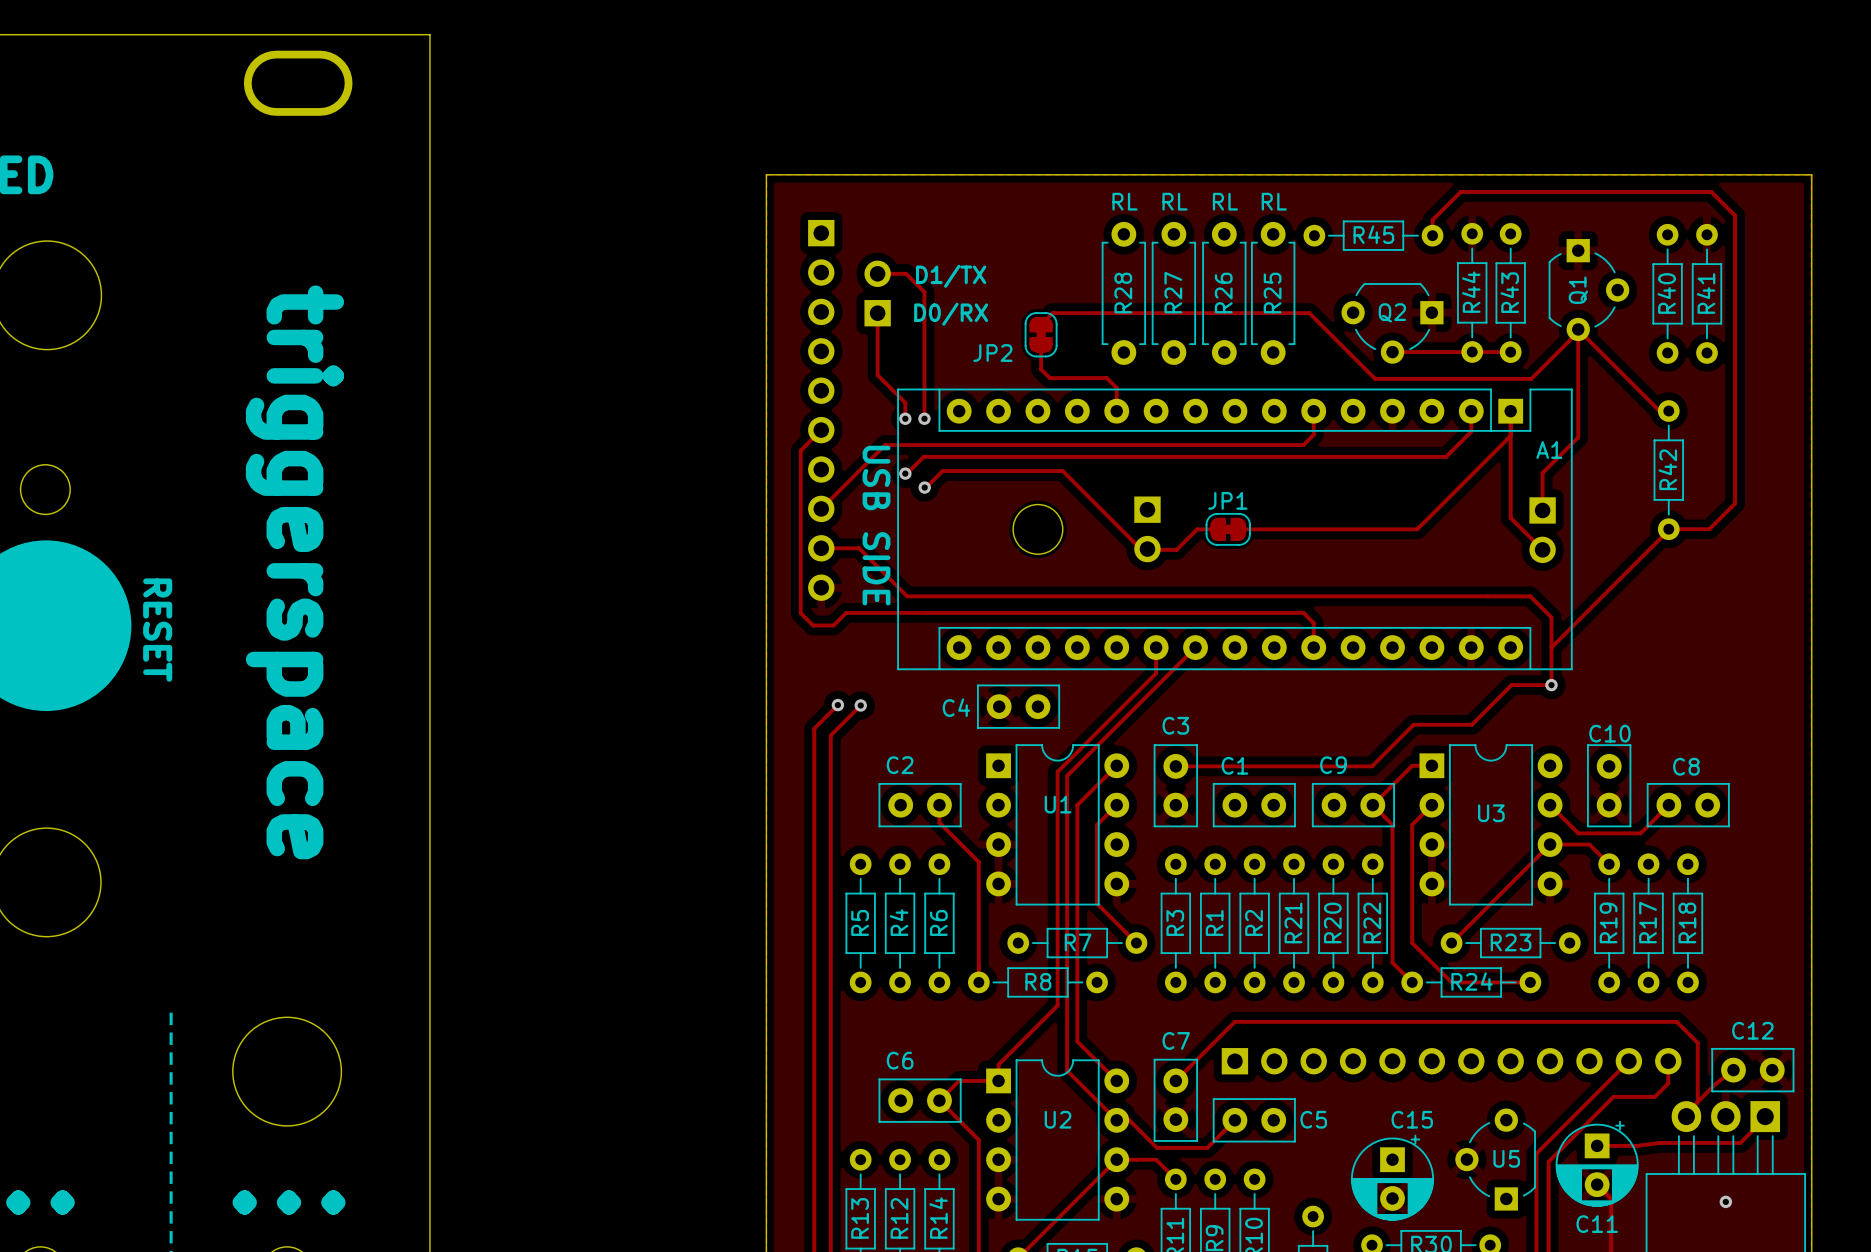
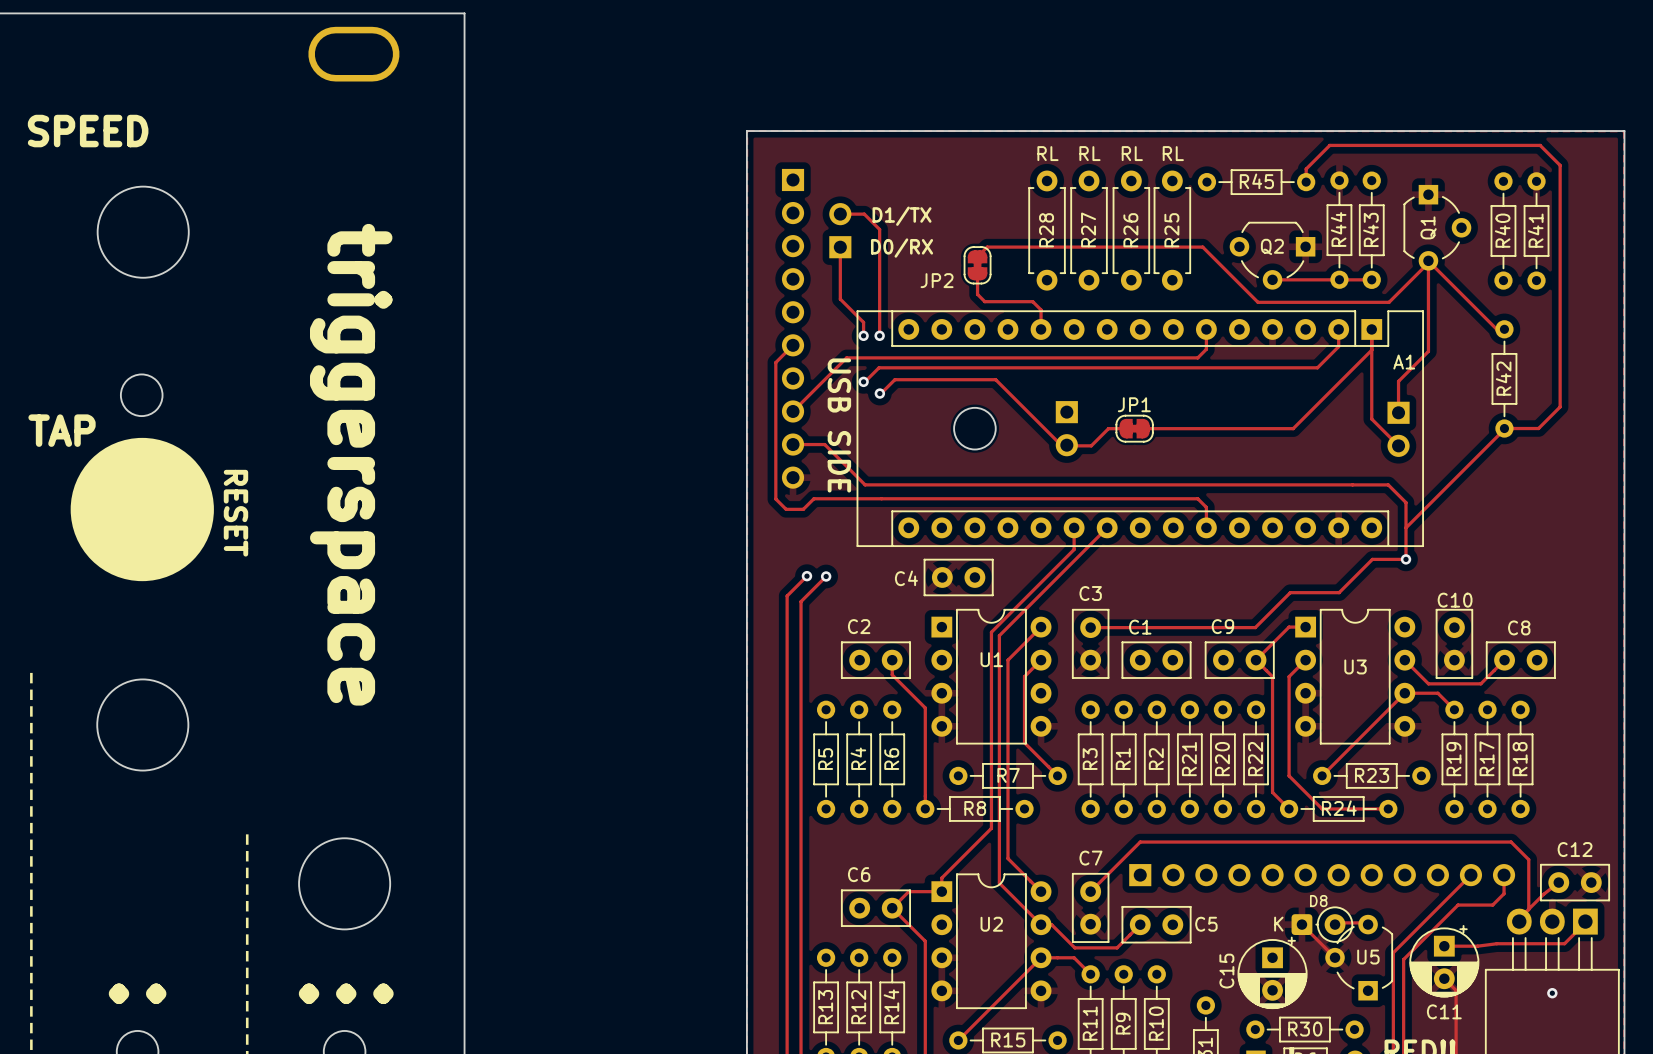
track: none -> (1344, 922) (1360, 922)
C15 name rotation: 0° (1412, 1119) -> 90° counterclockwise (1226, 971)
C15 name position: C15 (1412, 1119) -> C15 (1226, 971)
D8: none -> (1322, 924)
track: none -> (1310, 933) (1328, 951)

